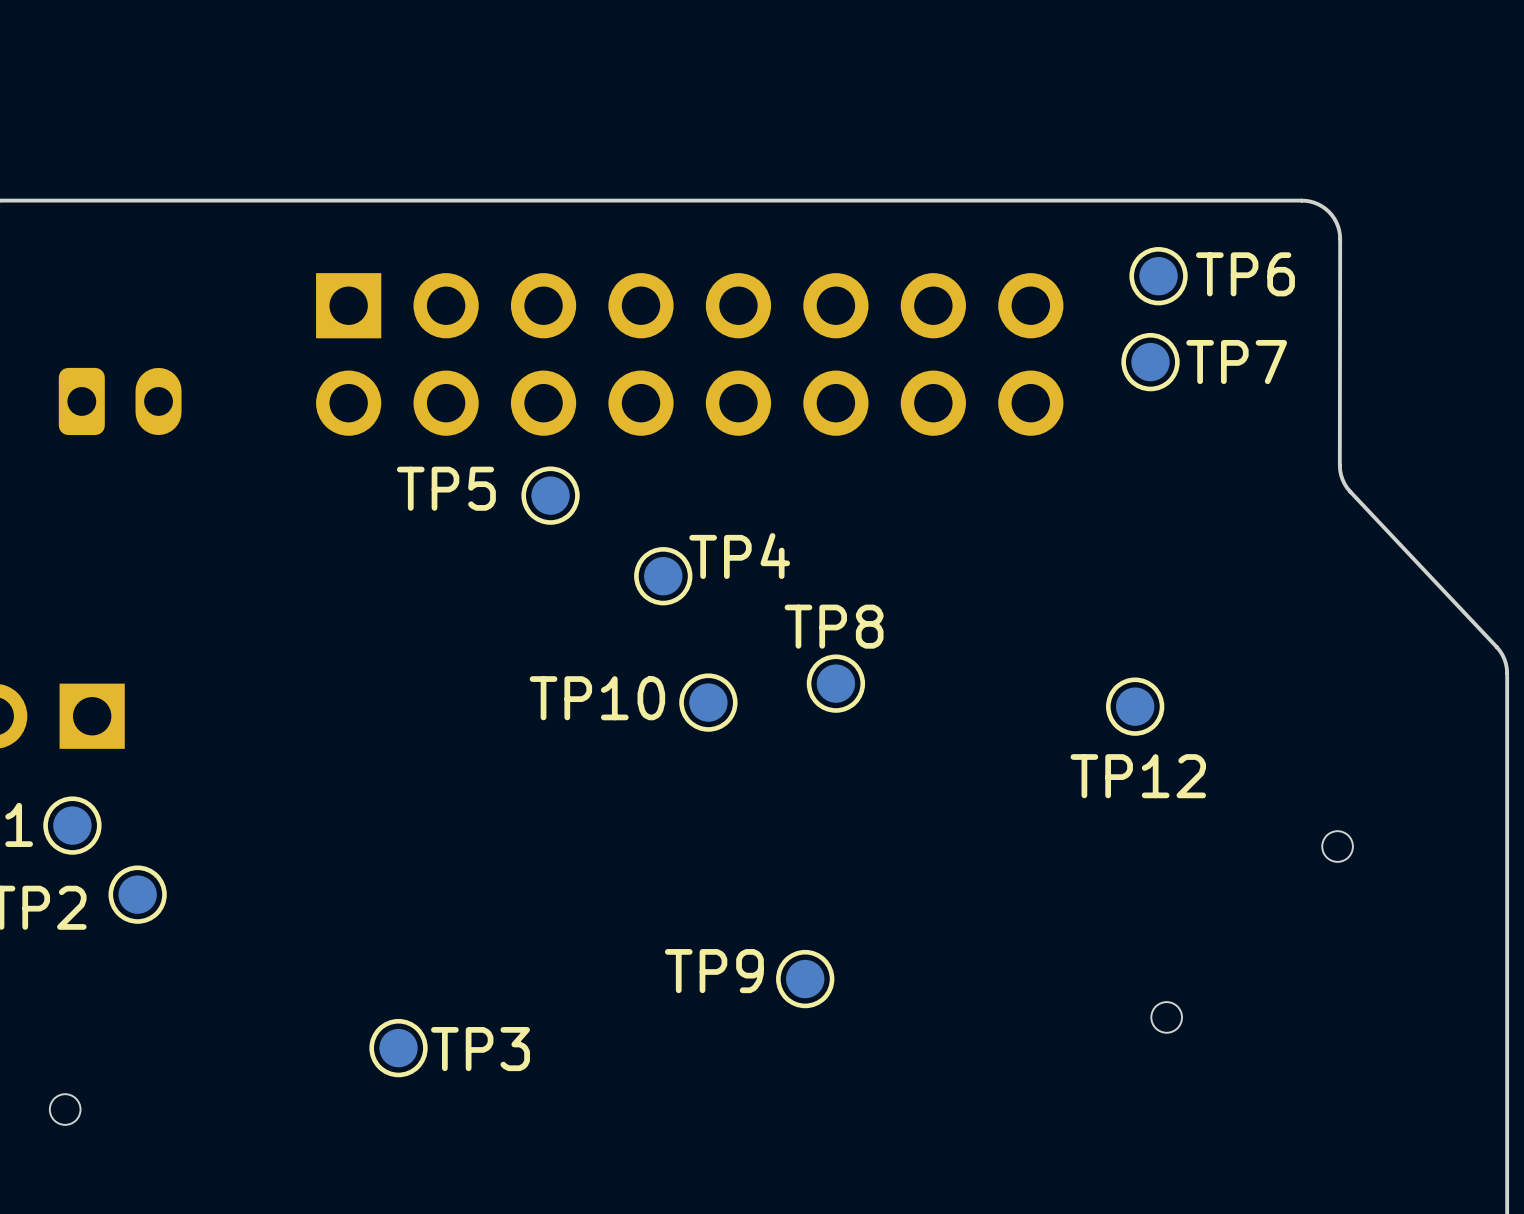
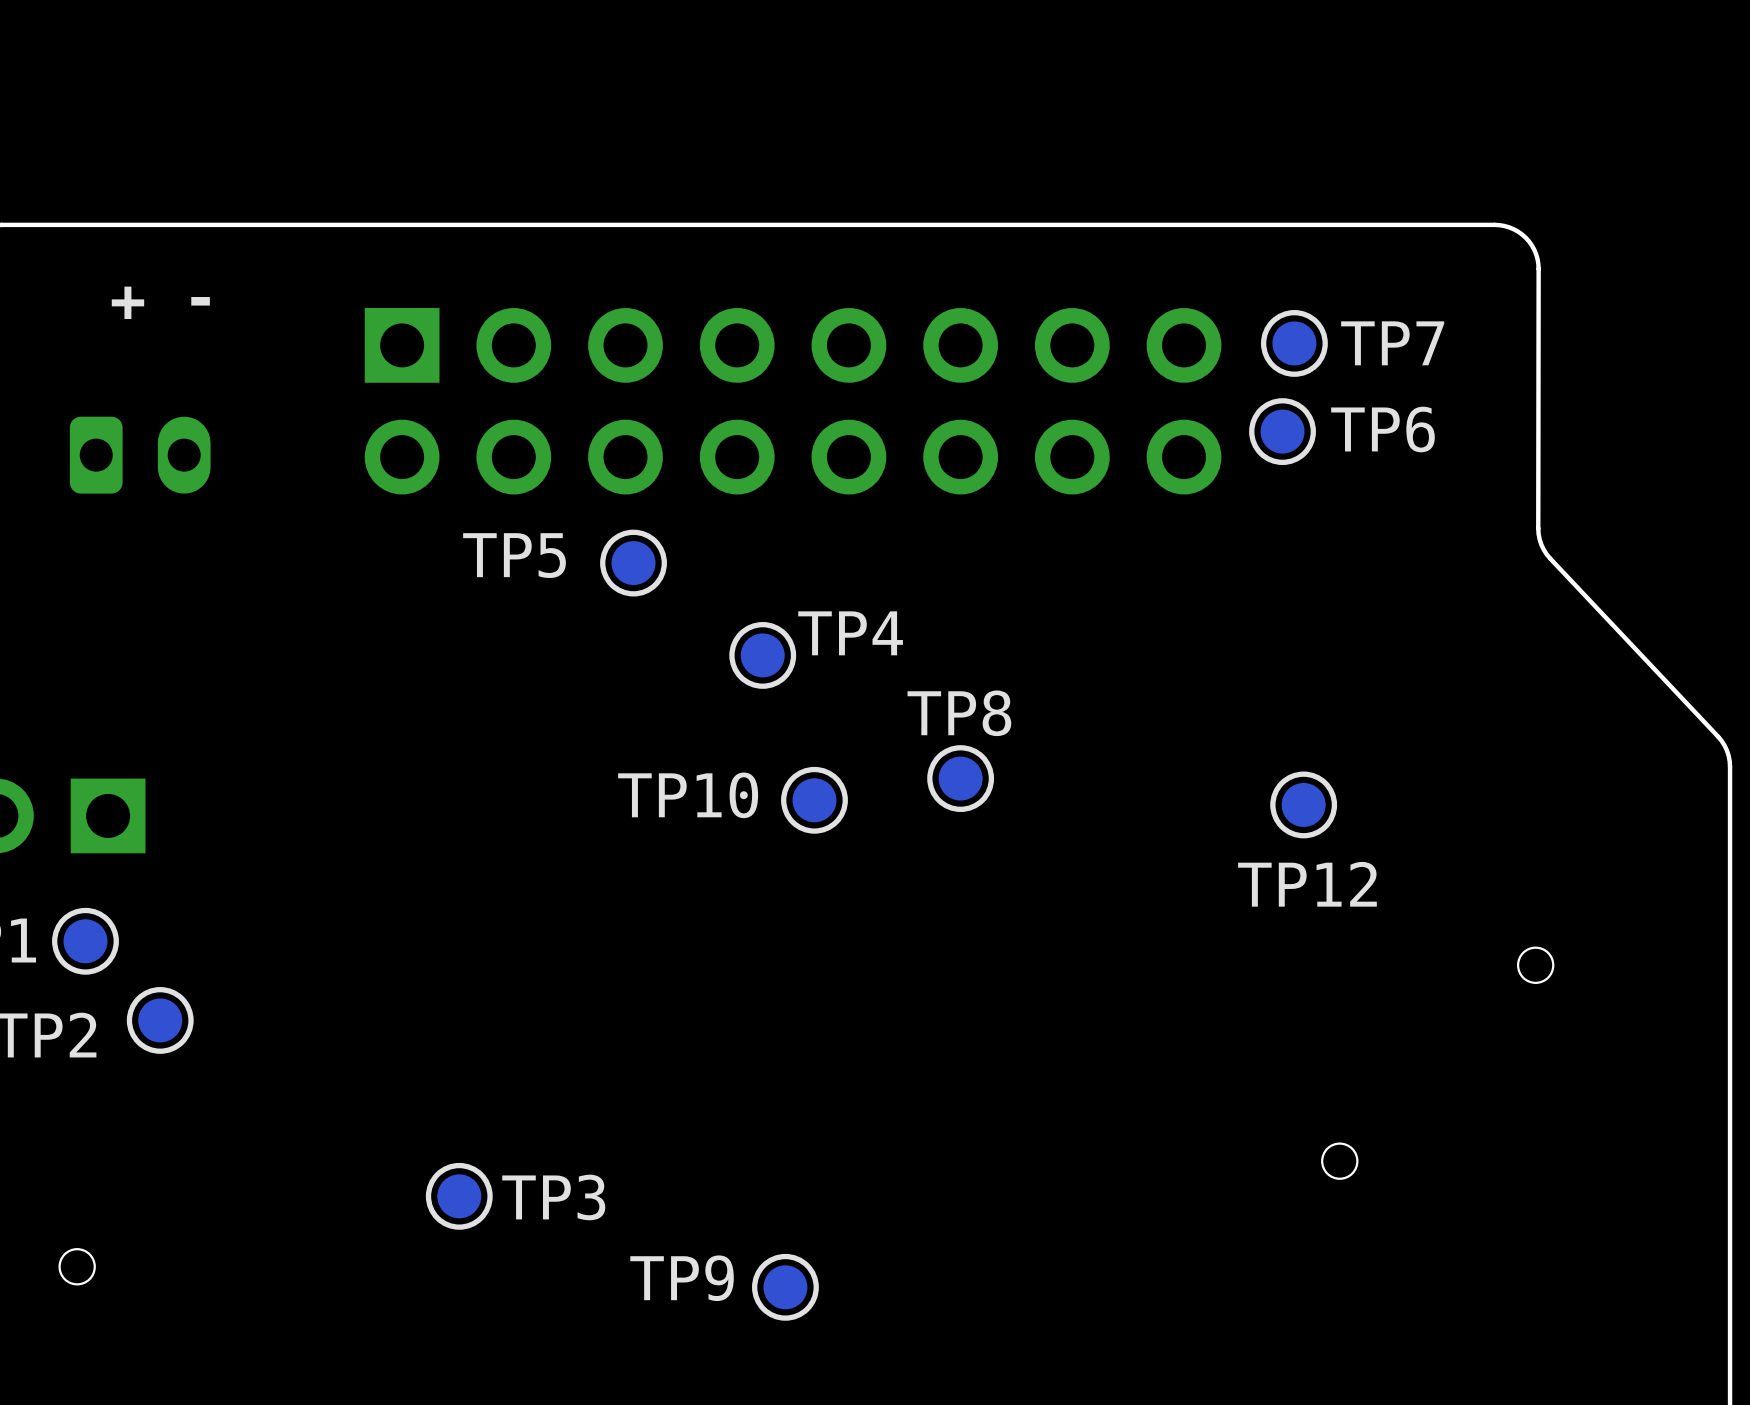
text: none -> - + (160, 302)
TP6 position: (1158, 276) -> (1282, 431)
TP7 position: (1150, 362) -> (1294, 343)
TP9 position: (805, 979) -> (785, 1287)

